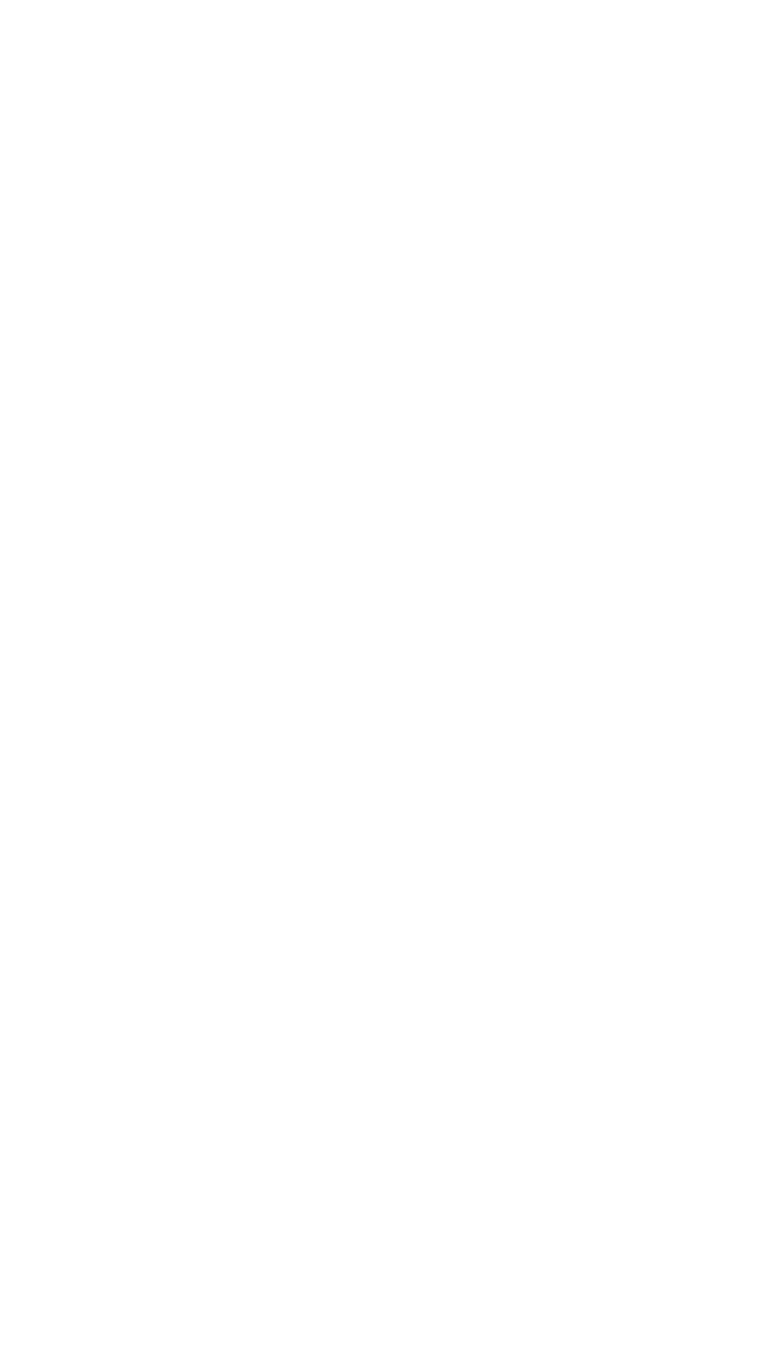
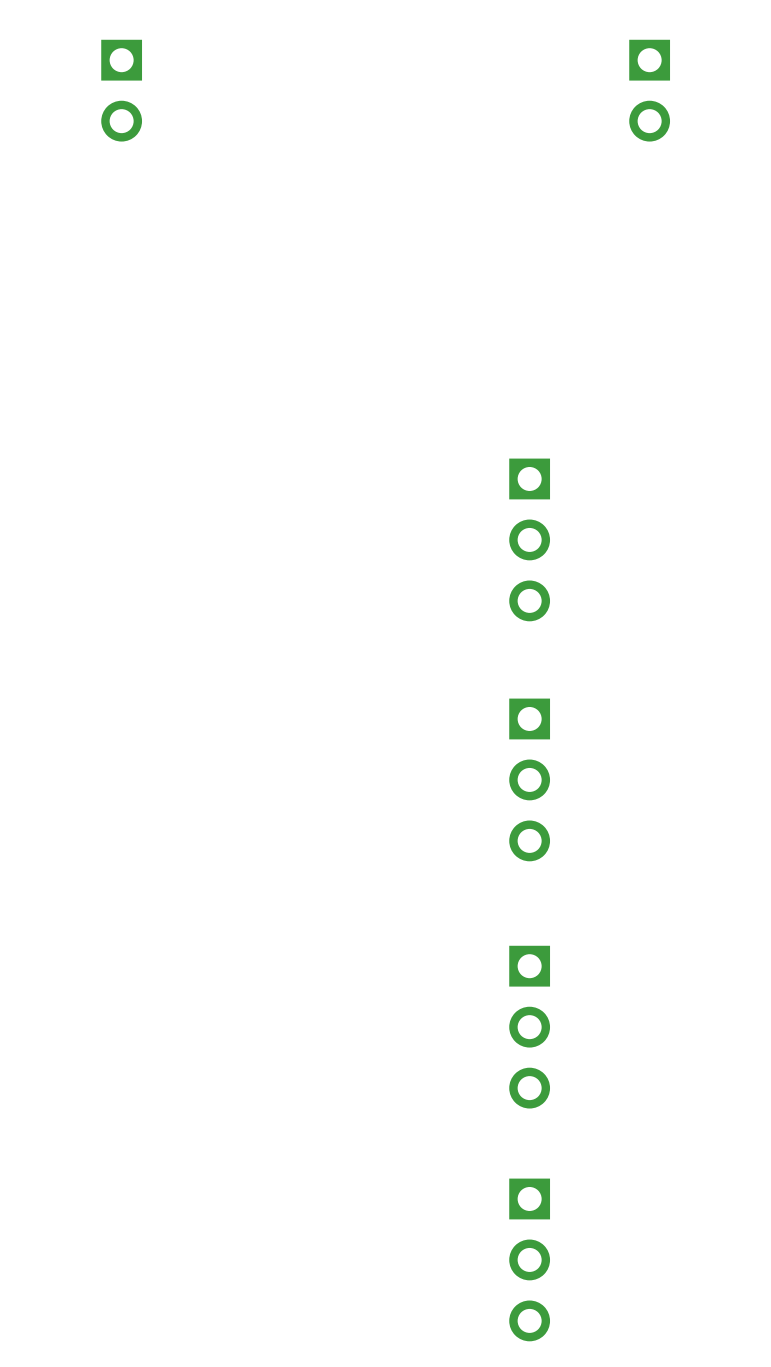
part: none -> (121, 90)
part: none -> (649, 90)
part: none -> (529, 539)
part: none -> (529, 779)
part: none -> (529, 1027)
part: none -> (529, 1259)

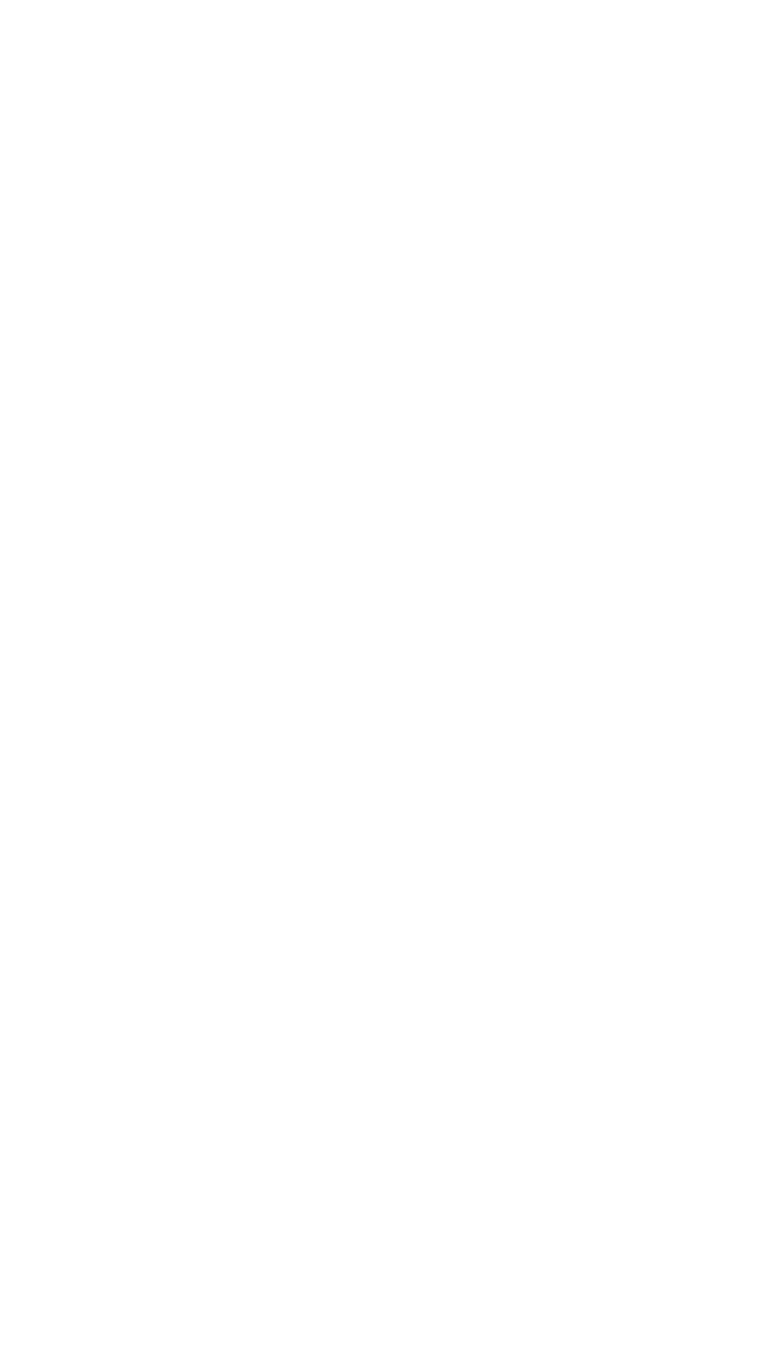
part: (121, 90) -> none
part: (649, 90) -> none
part: (529, 539) -> none
part: (529, 779) -> none
part: (529, 1027) -> none
part: (529, 1259) -> none

